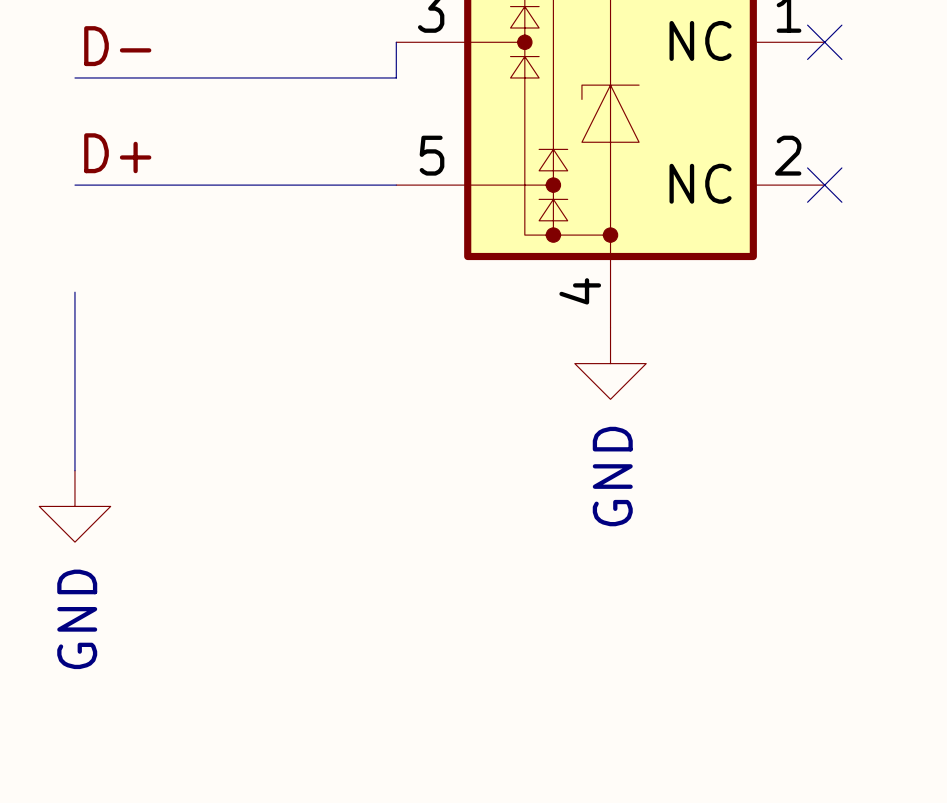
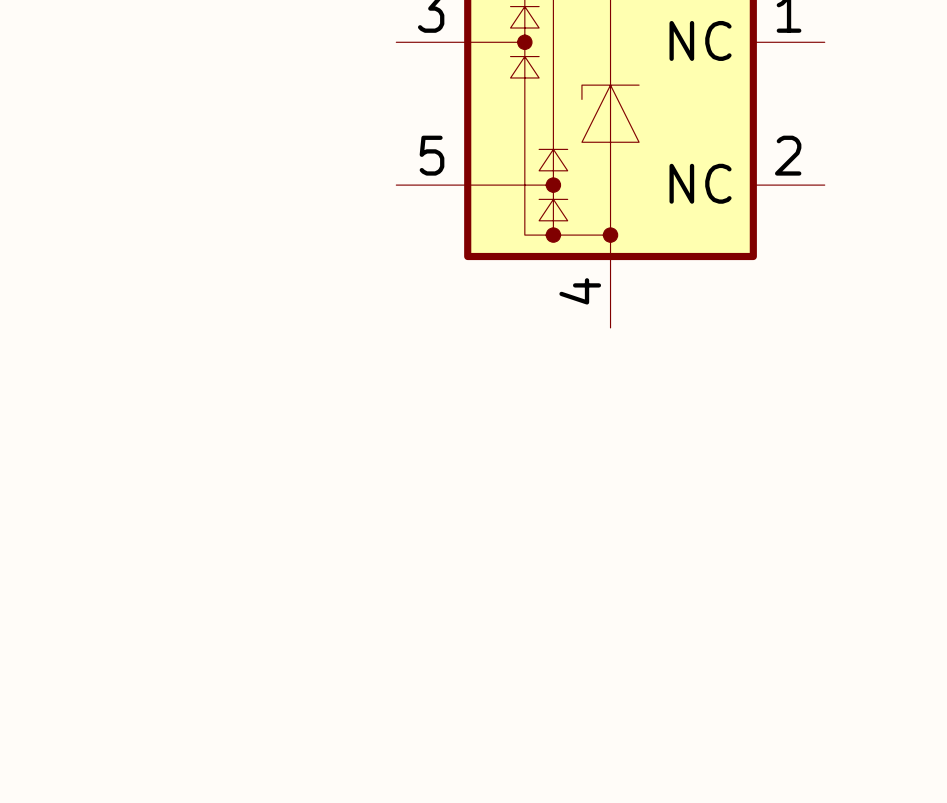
wire: (396, 42) (396, 77) (74, 77) -> none
no-connect mark: (824, 42) -> none
label: D- (117, 46) -> none
label: D+ (117, 153) -> none
wire: (74, 185) (396, 185) -> none
no-connect mark: (824, 185) -> none
wire: (74, 292) (74, 470) -> none
power symbol: GND (610, 363) -> none
power symbol: GND (74, 506) -> none

